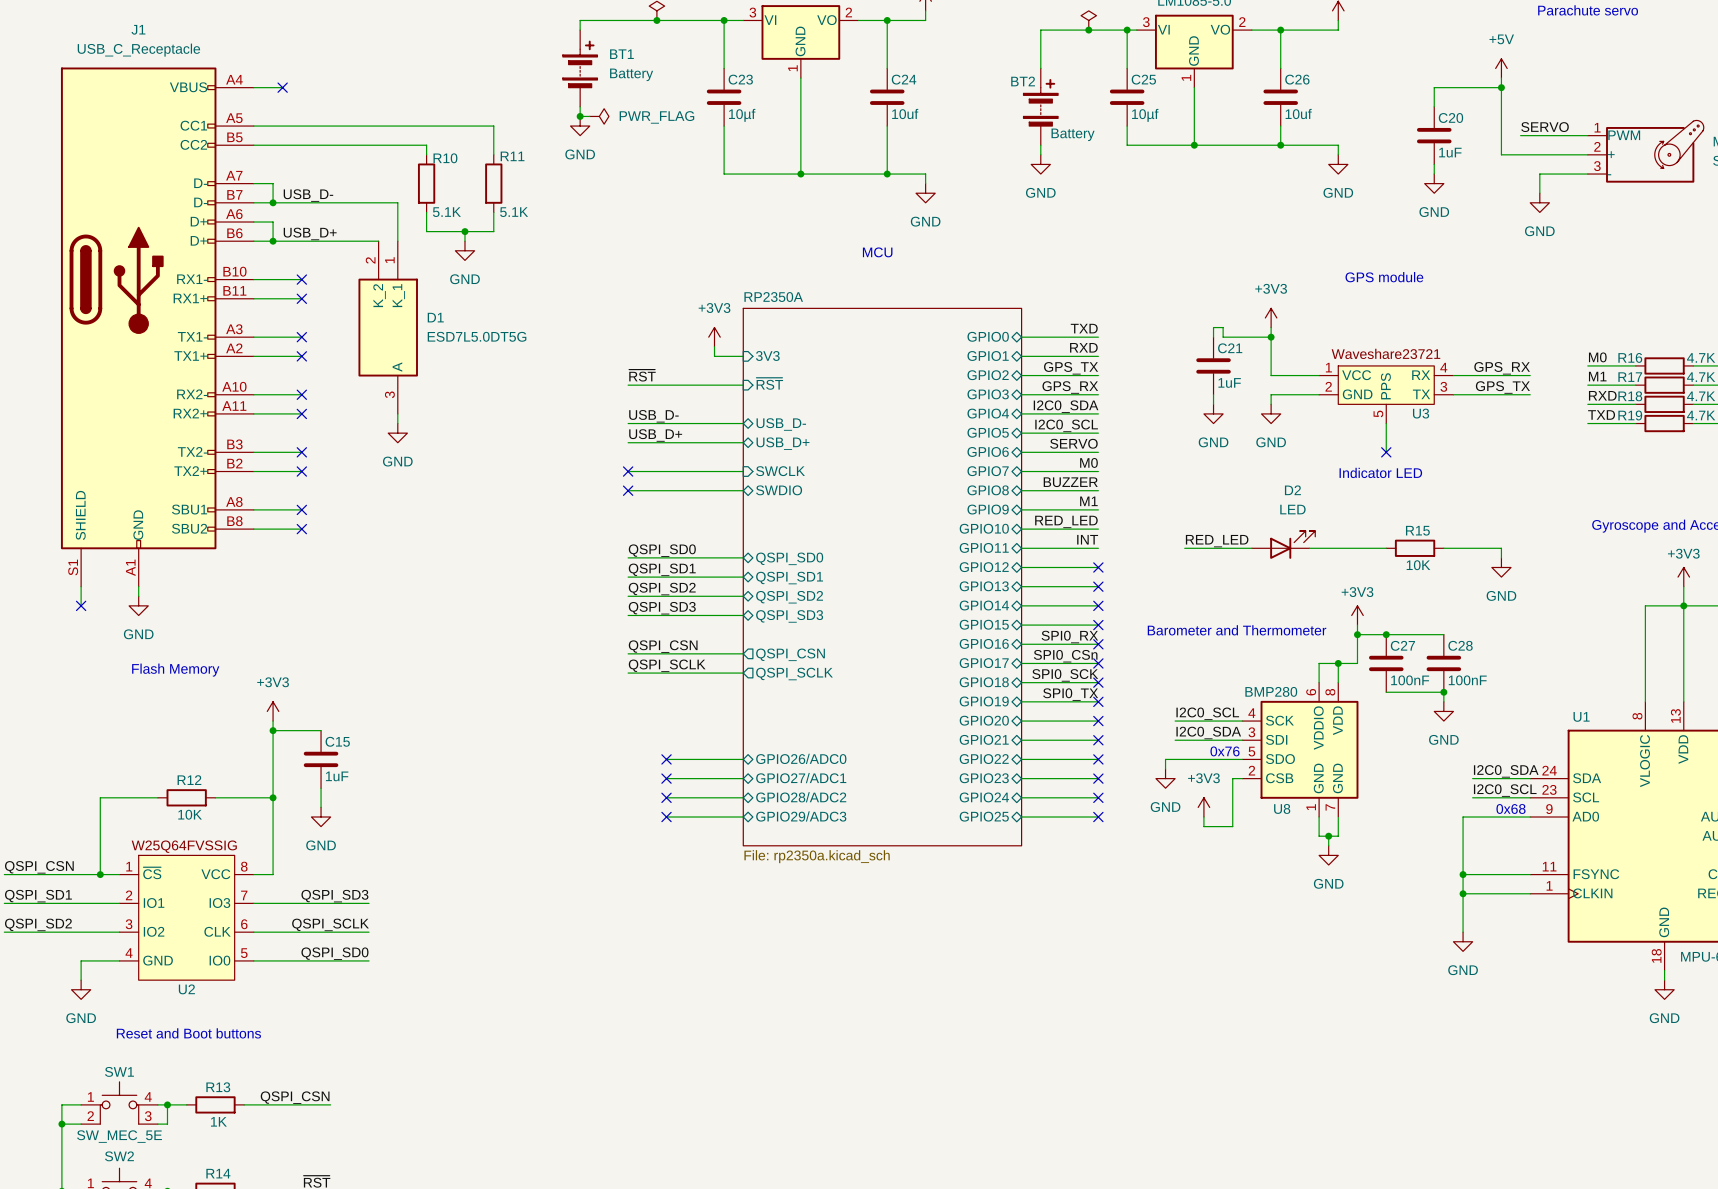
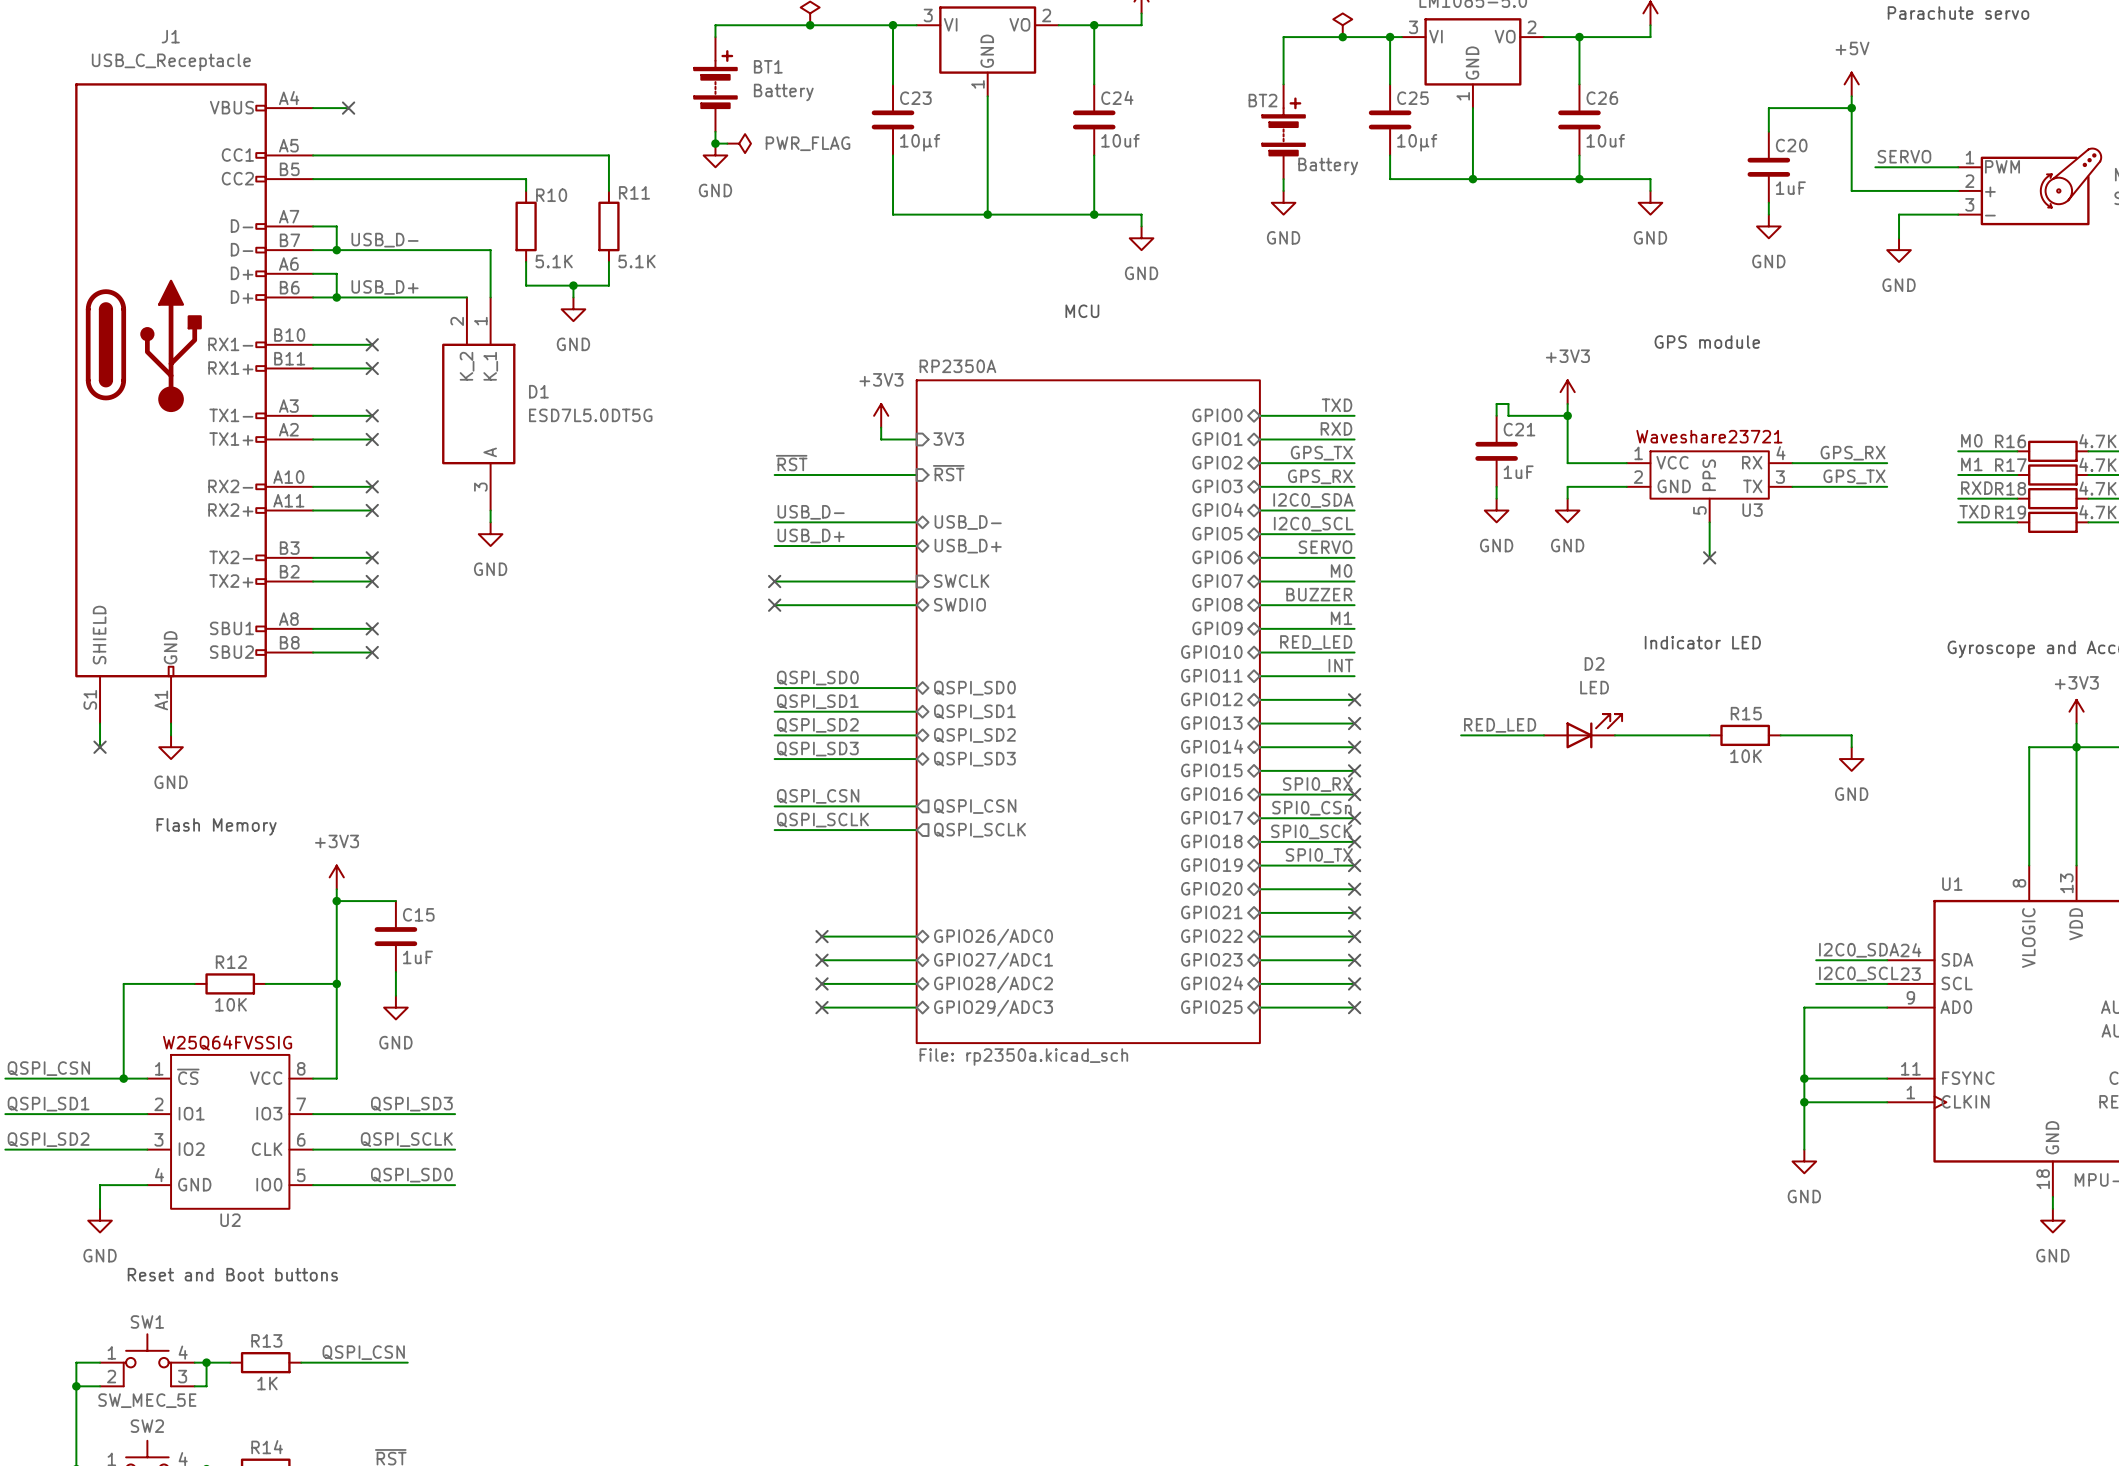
text position: Indicator LED (1380, 472) -> Indicator LED (1702, 642)
label position: RED_LED (1217, 541) -> RED_LED (1500, 725)
D2 position: (1283, 544) -> (1583, 731)
wire: (1184, 548) (1251, 548) -> (1461, 735) (1543, 735)
wire: (1309, 548) (1386, 548) -> (1614, 735) (1709, 735)
R15 position: (1415, 548) -> (1745, 735)
wire: (1443, 548) (1501, 548) (1501, 557) -> (1780, 735) (1851, 735) (1851, 747)
power symbol position: GND (1501, 567) -> GND (1851, 759)
power symbol: +3V3 (1357, 615) -> none
wire: (1357, 625) (1357, 663) (1319, 663) (1319, 682) -> none
text: Barometer and Thermometer (1237, 630) -> none
wire: (1357, 634) (1443, 634) -> none
junction: (1357, 634) -> none
junction: (1386, 634) -> none
wire: (1338, 663) (1338, 682) -> none
junction: (1338, 663) -> none
C27: 100nF (1386, 663) -> none
C28: 100nF (1443, 663) -> none
wire: (1386, 692) (1443, 692) (1443, 701) -> none
junction: (1443, 692) -> none
power symbol: GND (1443, 711) -> none
label: I2C0_SCL (1207, 713) -> none
wire: (1175, 721) (1242, 721) -> none
label: I2C0_SDA (1208, 732) -> none
wire: (1175, 740) (1242, 740) -> none
U8: BMP280 (1300, 749) -> none
text: 0x76 (1225, 751) -> none
wire: (1242, 759) (1165, 759) (1165, 769) -> none
power symbol: GND (1165, 778) -> none
wire: (1242, 778) (1232, 778) (1232, 826) (1203, 826) (1203, 817) -> none
power symbol: +3V3 (1203, 807) -> none
text: 0x68 (1511, 808) -> none
wire: (1319, 817) (1319, 836) (1338, 836) (1338, 817) -> none
wire: (1328, 836) (1328, 845) -> none
junction: (1328, 836) -> none
power symbol: GND (1328, 855) -> none

